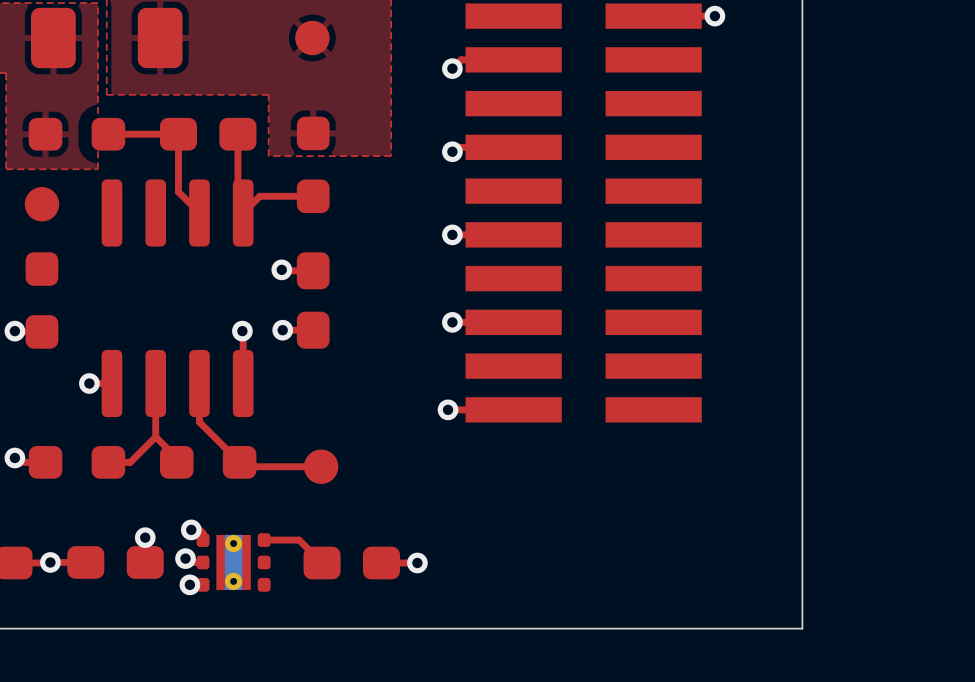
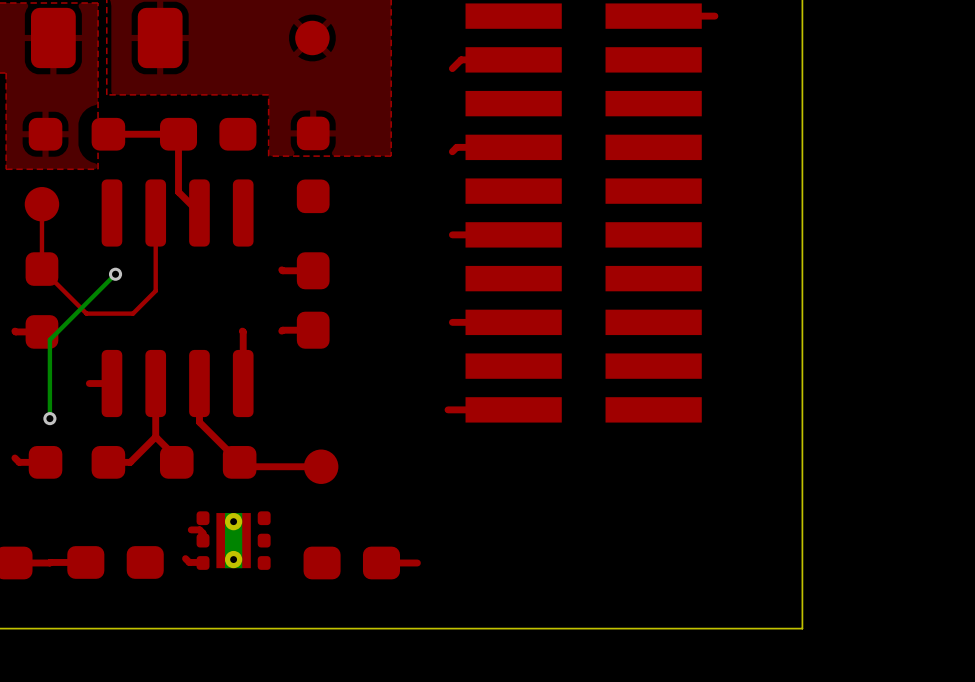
via: (714, 16) -> none
via: (452, 68) -> none
top track: (237, 134) (237, 207) (243, 212) (259, 196) (313, 196) -> none
via: (452, 151) -> none
top track: none -> (41, 204) (41, 269) (86, 313) (133, 313) (155, 290) (155, 212)
via: (452, 234) -> none
via: (281, 269) -> none
bottom track: none -> (115, 274) (49, 339) (49, 418)
via: none -> (115, 274)
via: (452, 322) -> none
via: (282, 330) -> none
via: (14, 331) -> none
via: (242, 331) -> none
via: (89, 383) -> none
via: (448, 409) -> none
via: none -> (49, 418)
via: (14, 457) -> none
via: (191, 529) -> none
via: (145, 537) -> none
top track: (264, 540) (299, 540) (322, 562) -> none
via: (185, 558) -> none
via: (50, 562) -> none
part position: (233, 562) -> (233, 540)
via: (417, 562) -> none
via: (189, 584) -> none

